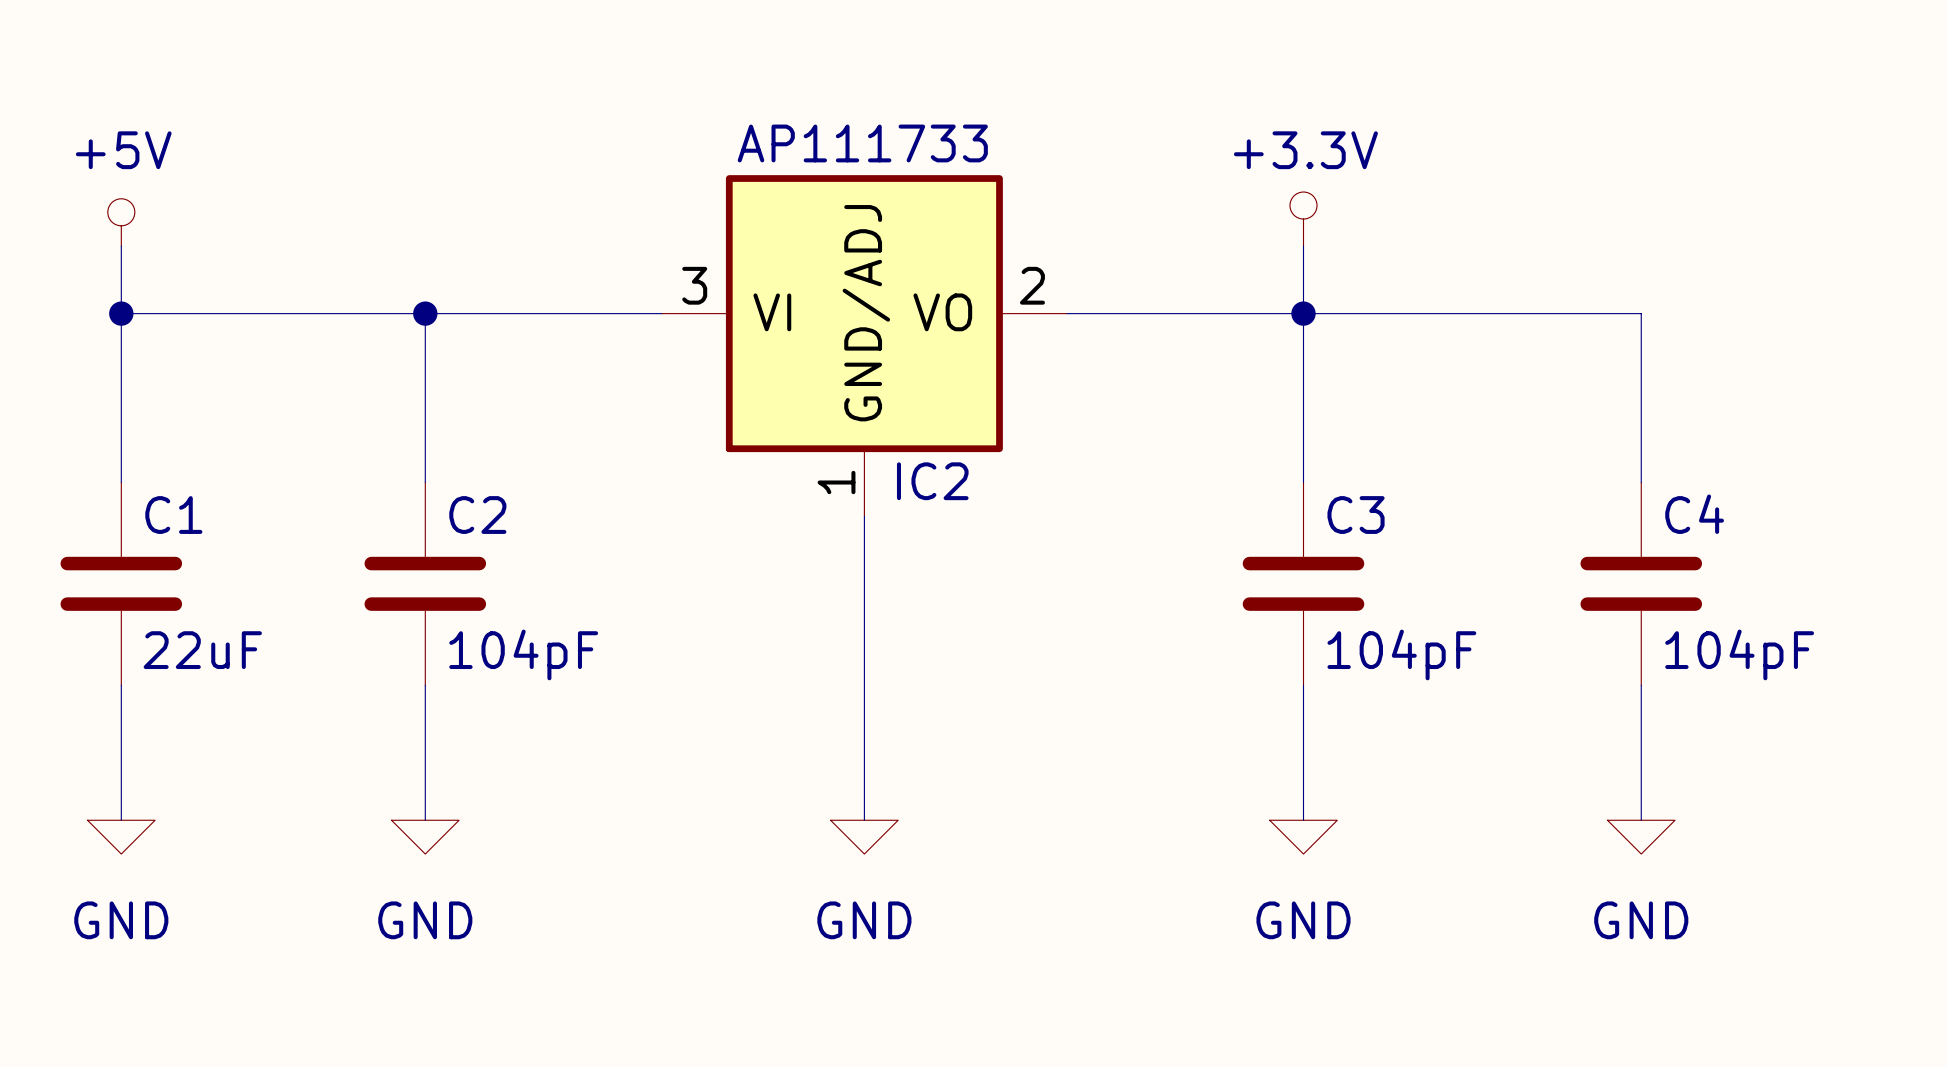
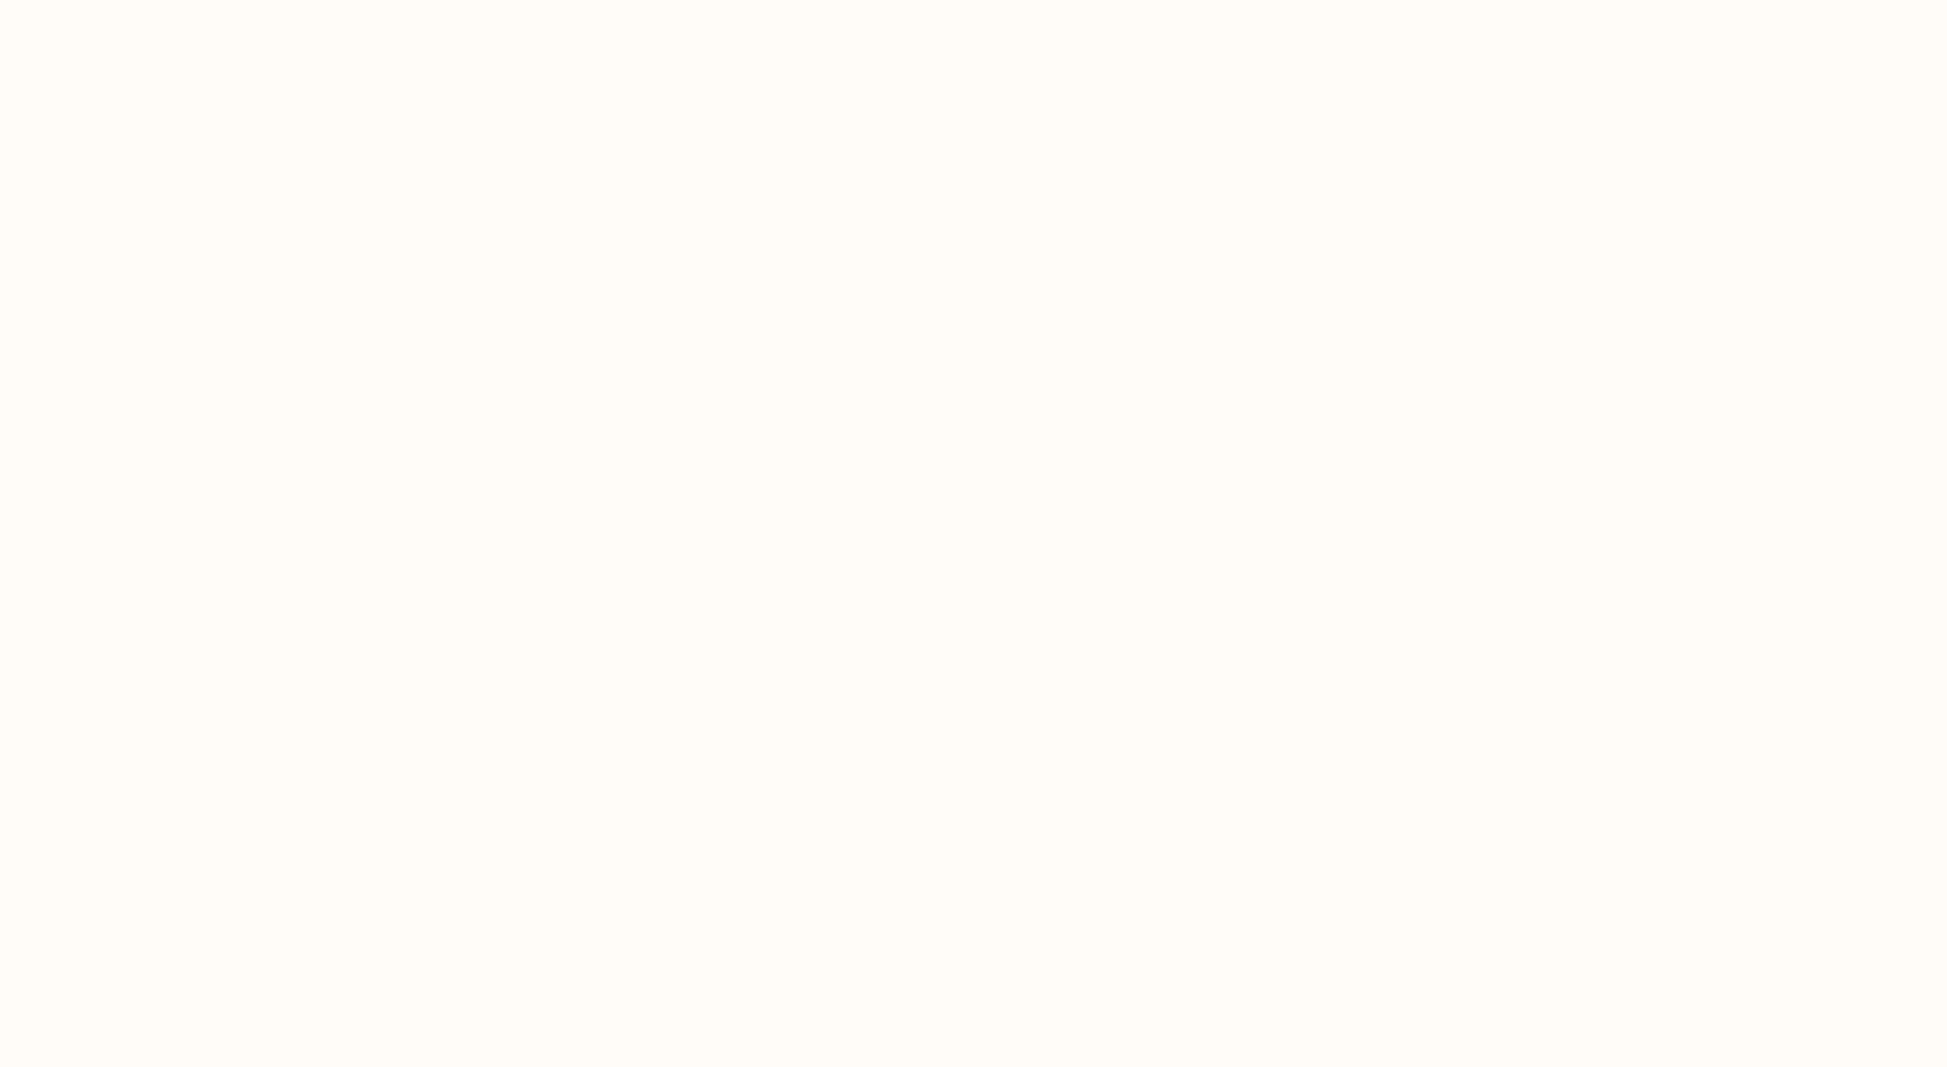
power symbol: +3.3V (1303, 219) -> none
power symbol: +5V (121, 222) -> none
wire: (121, 246) (121, 482) -> none
wire: (1303, 246) (1303, 482) -> none
wire: (121, 313) (661, 313) -> none
junction: (121, 313) -> none
wire: (425, 313) (425, 482) -> none
junction: (425, 313) -> none
wire: (1067, 313) (1641, 313) (1641, 482) -> none
junction: (1303, 313) -> none
IC2: AP111733 (864, 345) -> none
wire: (864, 516) (864, 820) -> none
C1: 22uF (121, 583) -> none
C2: 104pF (425, 583) -> none
C3: 104pF (1303, 583) -> none
C4: 104pF (1641, 583) -> none
wire: (121, 685) (121, 820) -> none
wire: (425, 685) (425, 820) -> none
wire: (1303, 685) (1303, 820) -> none
wire: (1641, 685) (1641, 820) -> none
power symbol: GND (121, 837) -> none
power symbol: GND (425, 837) -> none
power symbol: GND (864, 837) -> none
power symbol: GND (1303, 837) -> none
power symbol: GND (1641, 837) -> none

